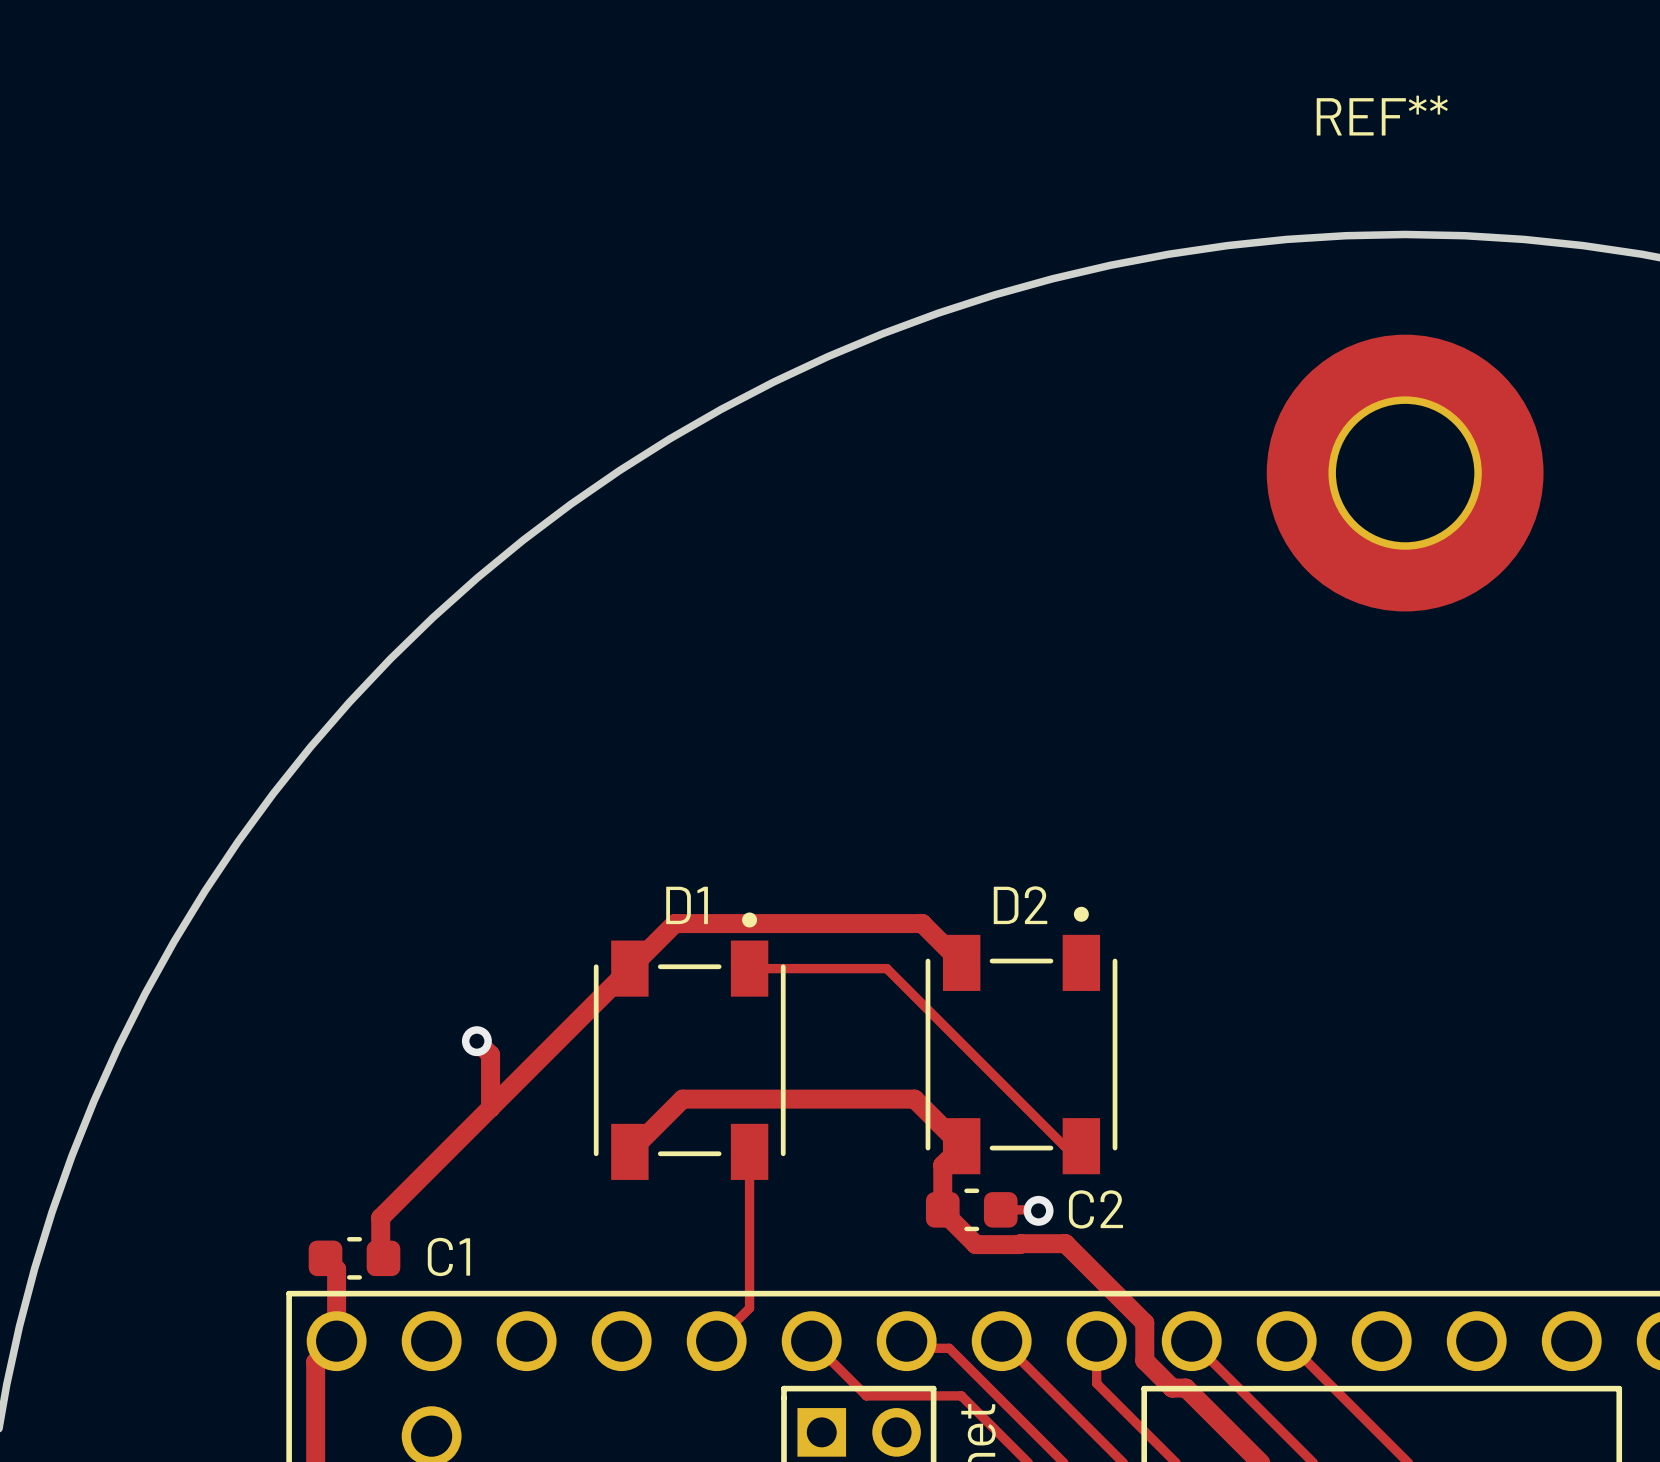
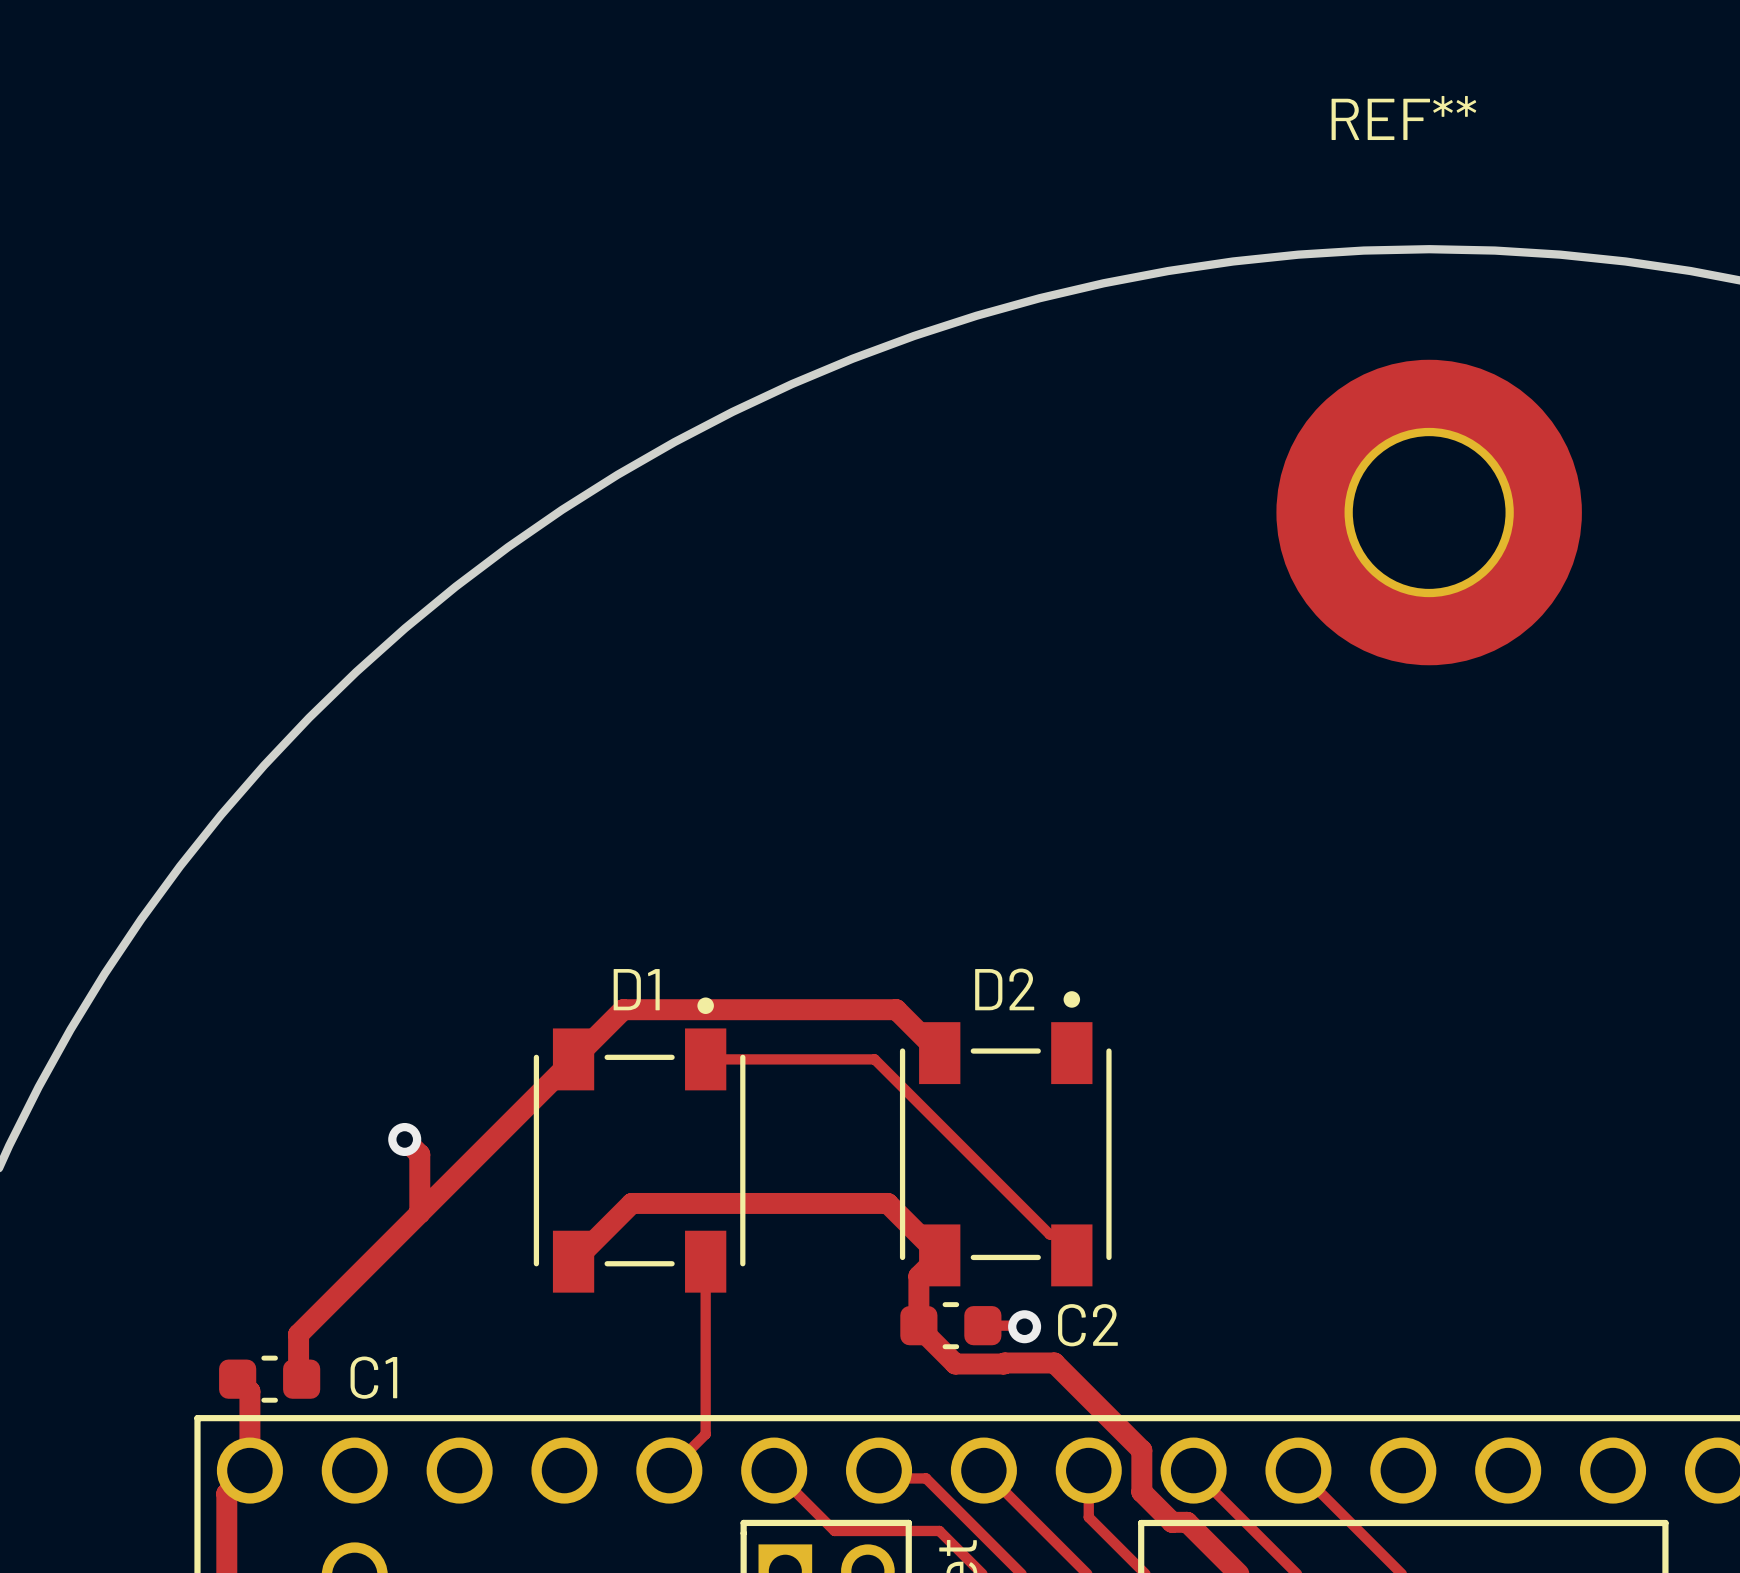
track: (886, 968) (1064, 1146) (1081, 1146) -> (857, 1059) (874, 1059) (1049, 1234) (1057, 1234) (1071, 1248)

